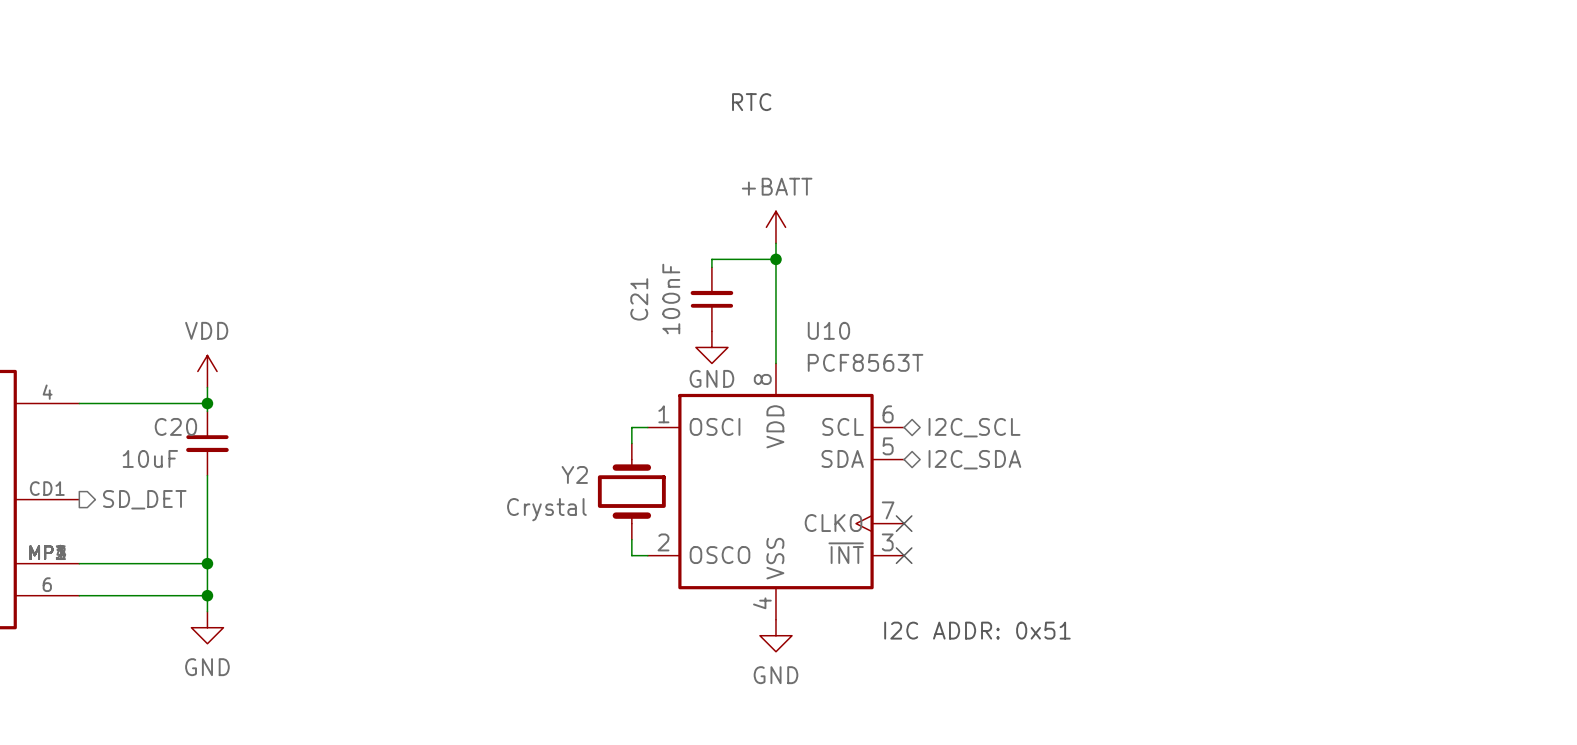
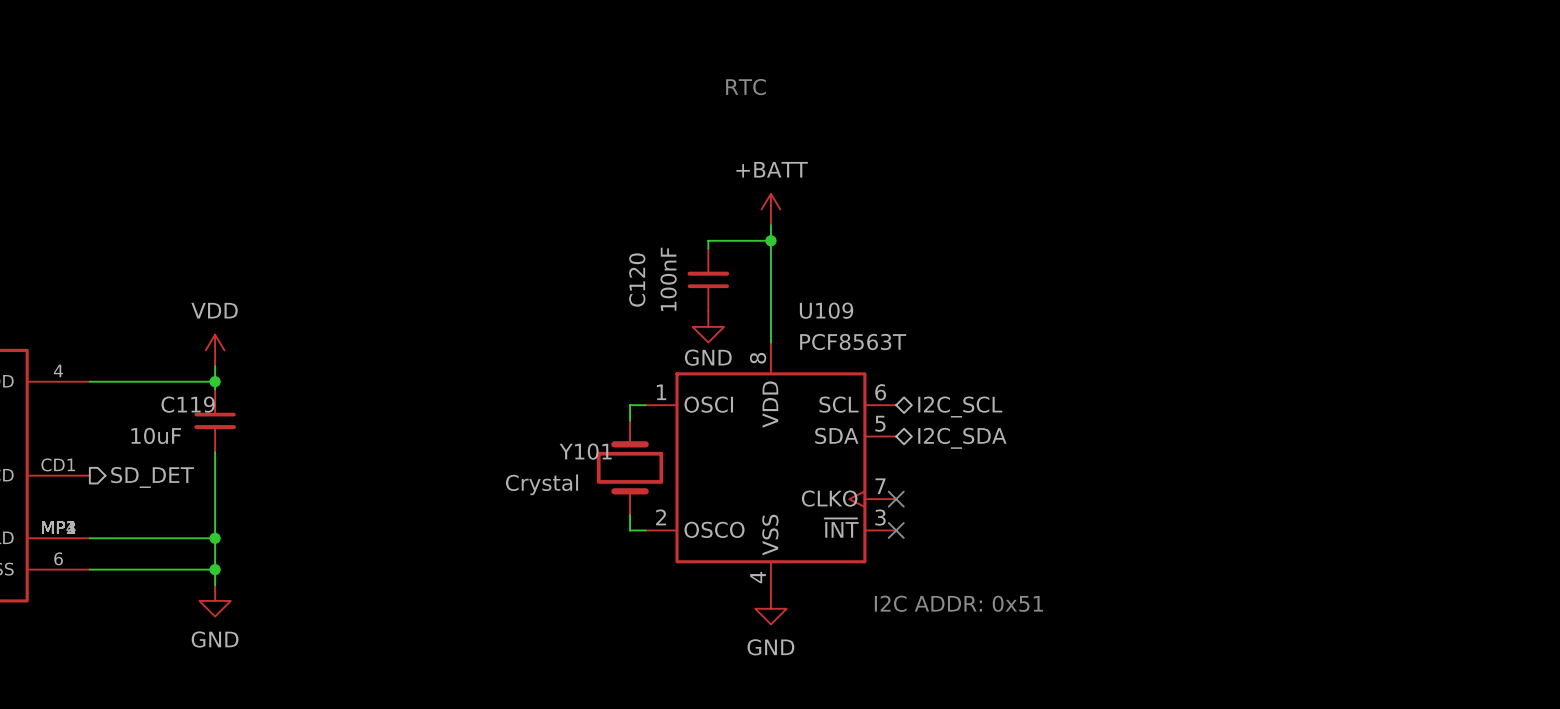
C21 name: C21 (639, 299) -> C120 (637, 280)
U10 name: U10 (828, 330) -> U109 (826, 310)
C20 name: C20 (175, 426) -> C119 (188, 404)
Y2 name: Y2 (574, 474) -> Y101 (585, 451)

